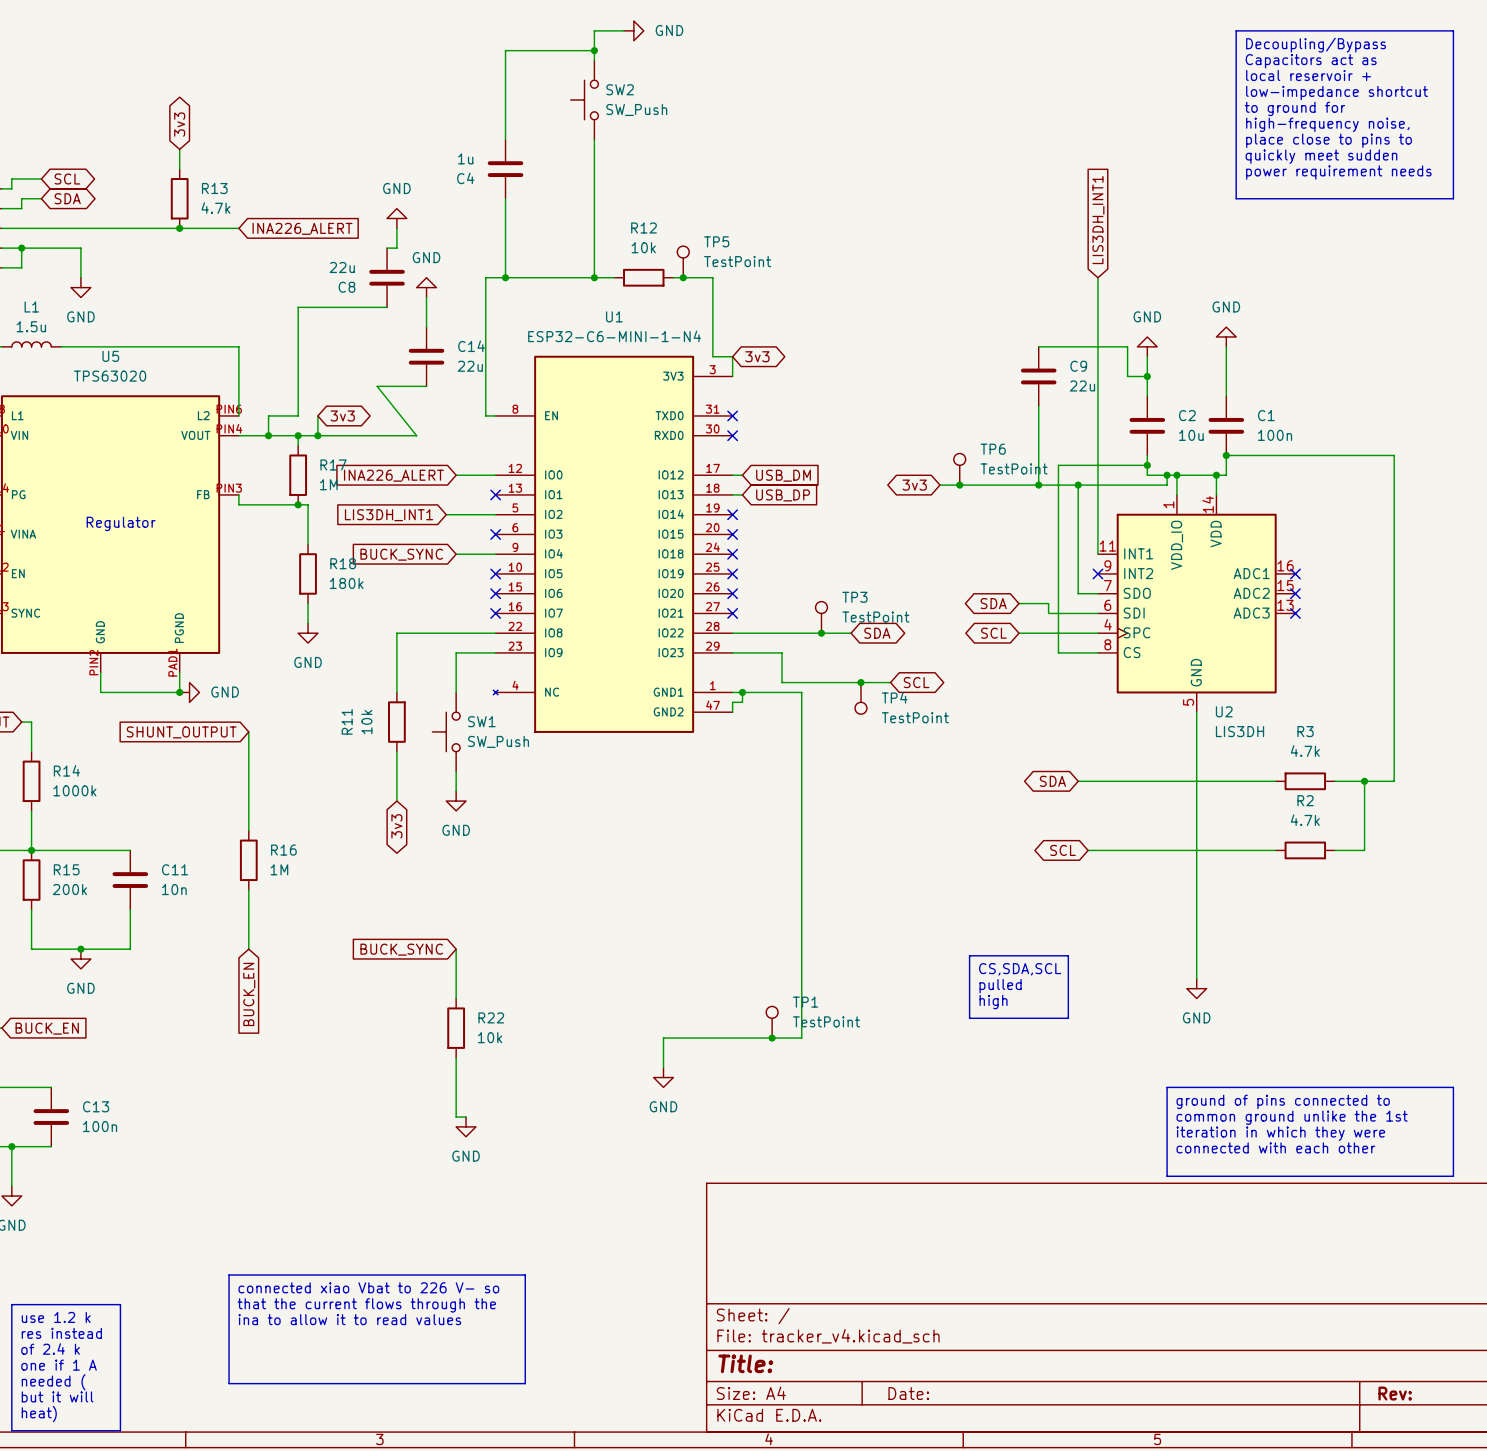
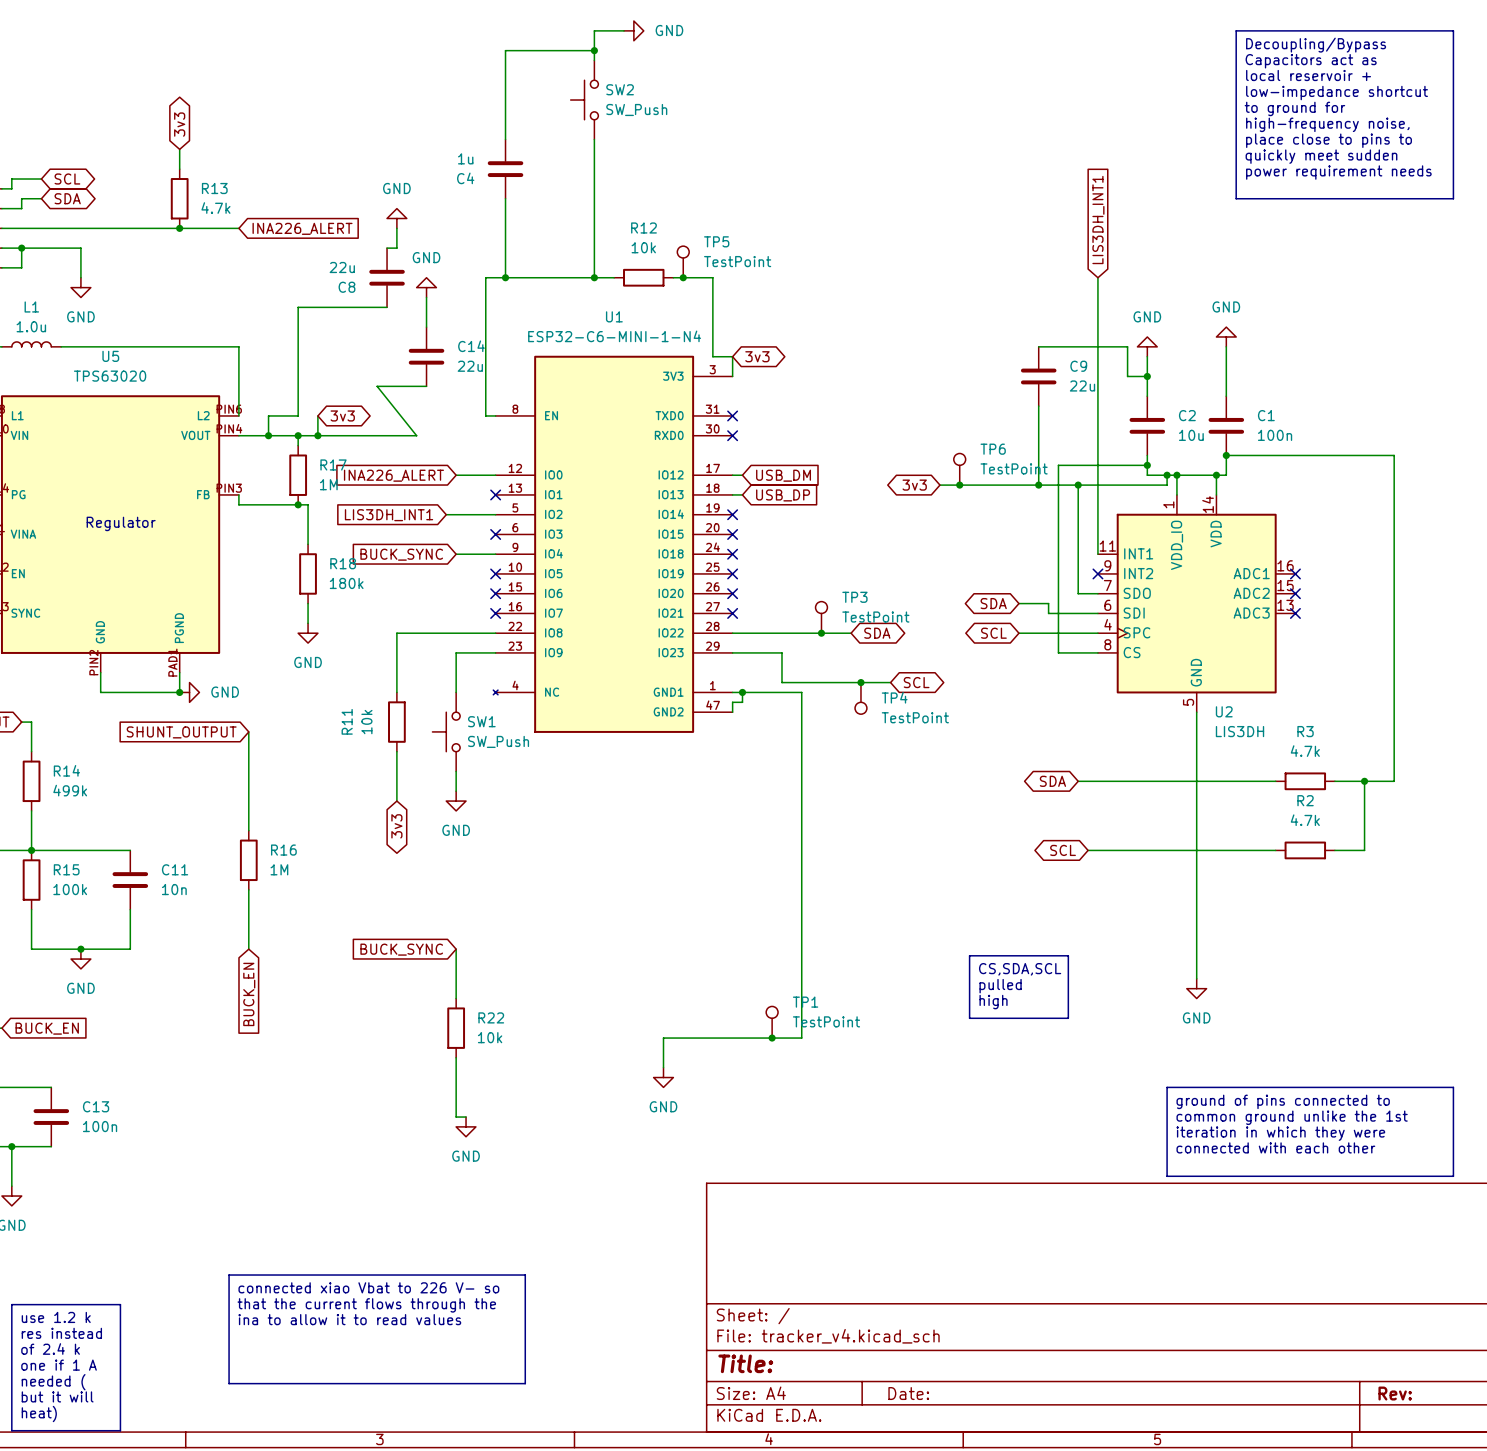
L1 value: 1.5u (31, 326) -> 1.0u (31, 326)
R14 value: 1000k (74, 790) -> 499k (70, 790)
R15 value: 200k (69, 889) -> 100k (70, 889)

